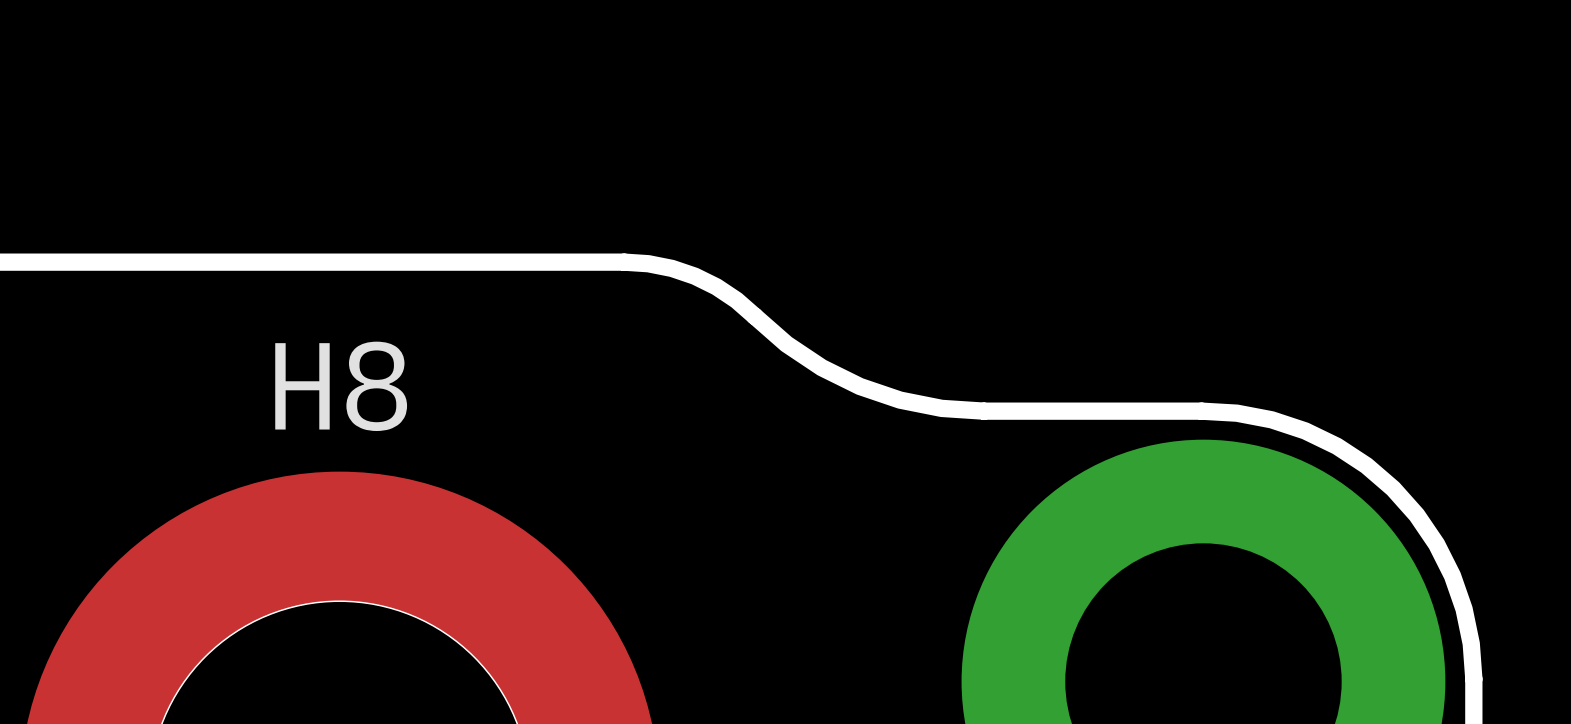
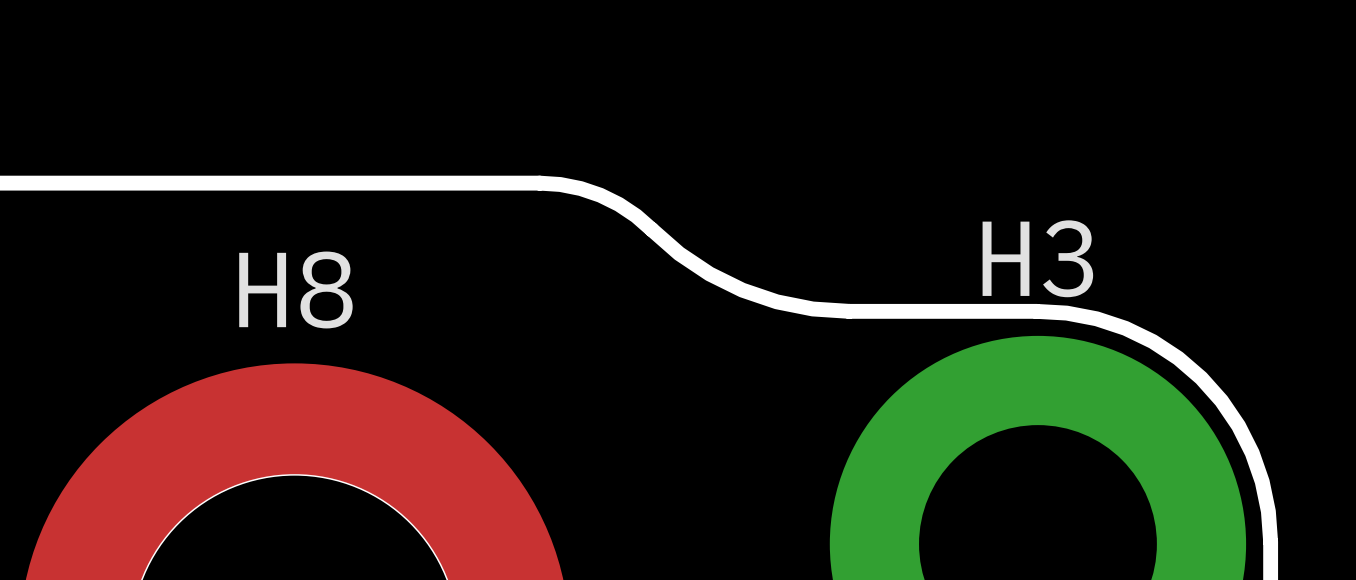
H3 name: none -> H3 (1037, 258)

